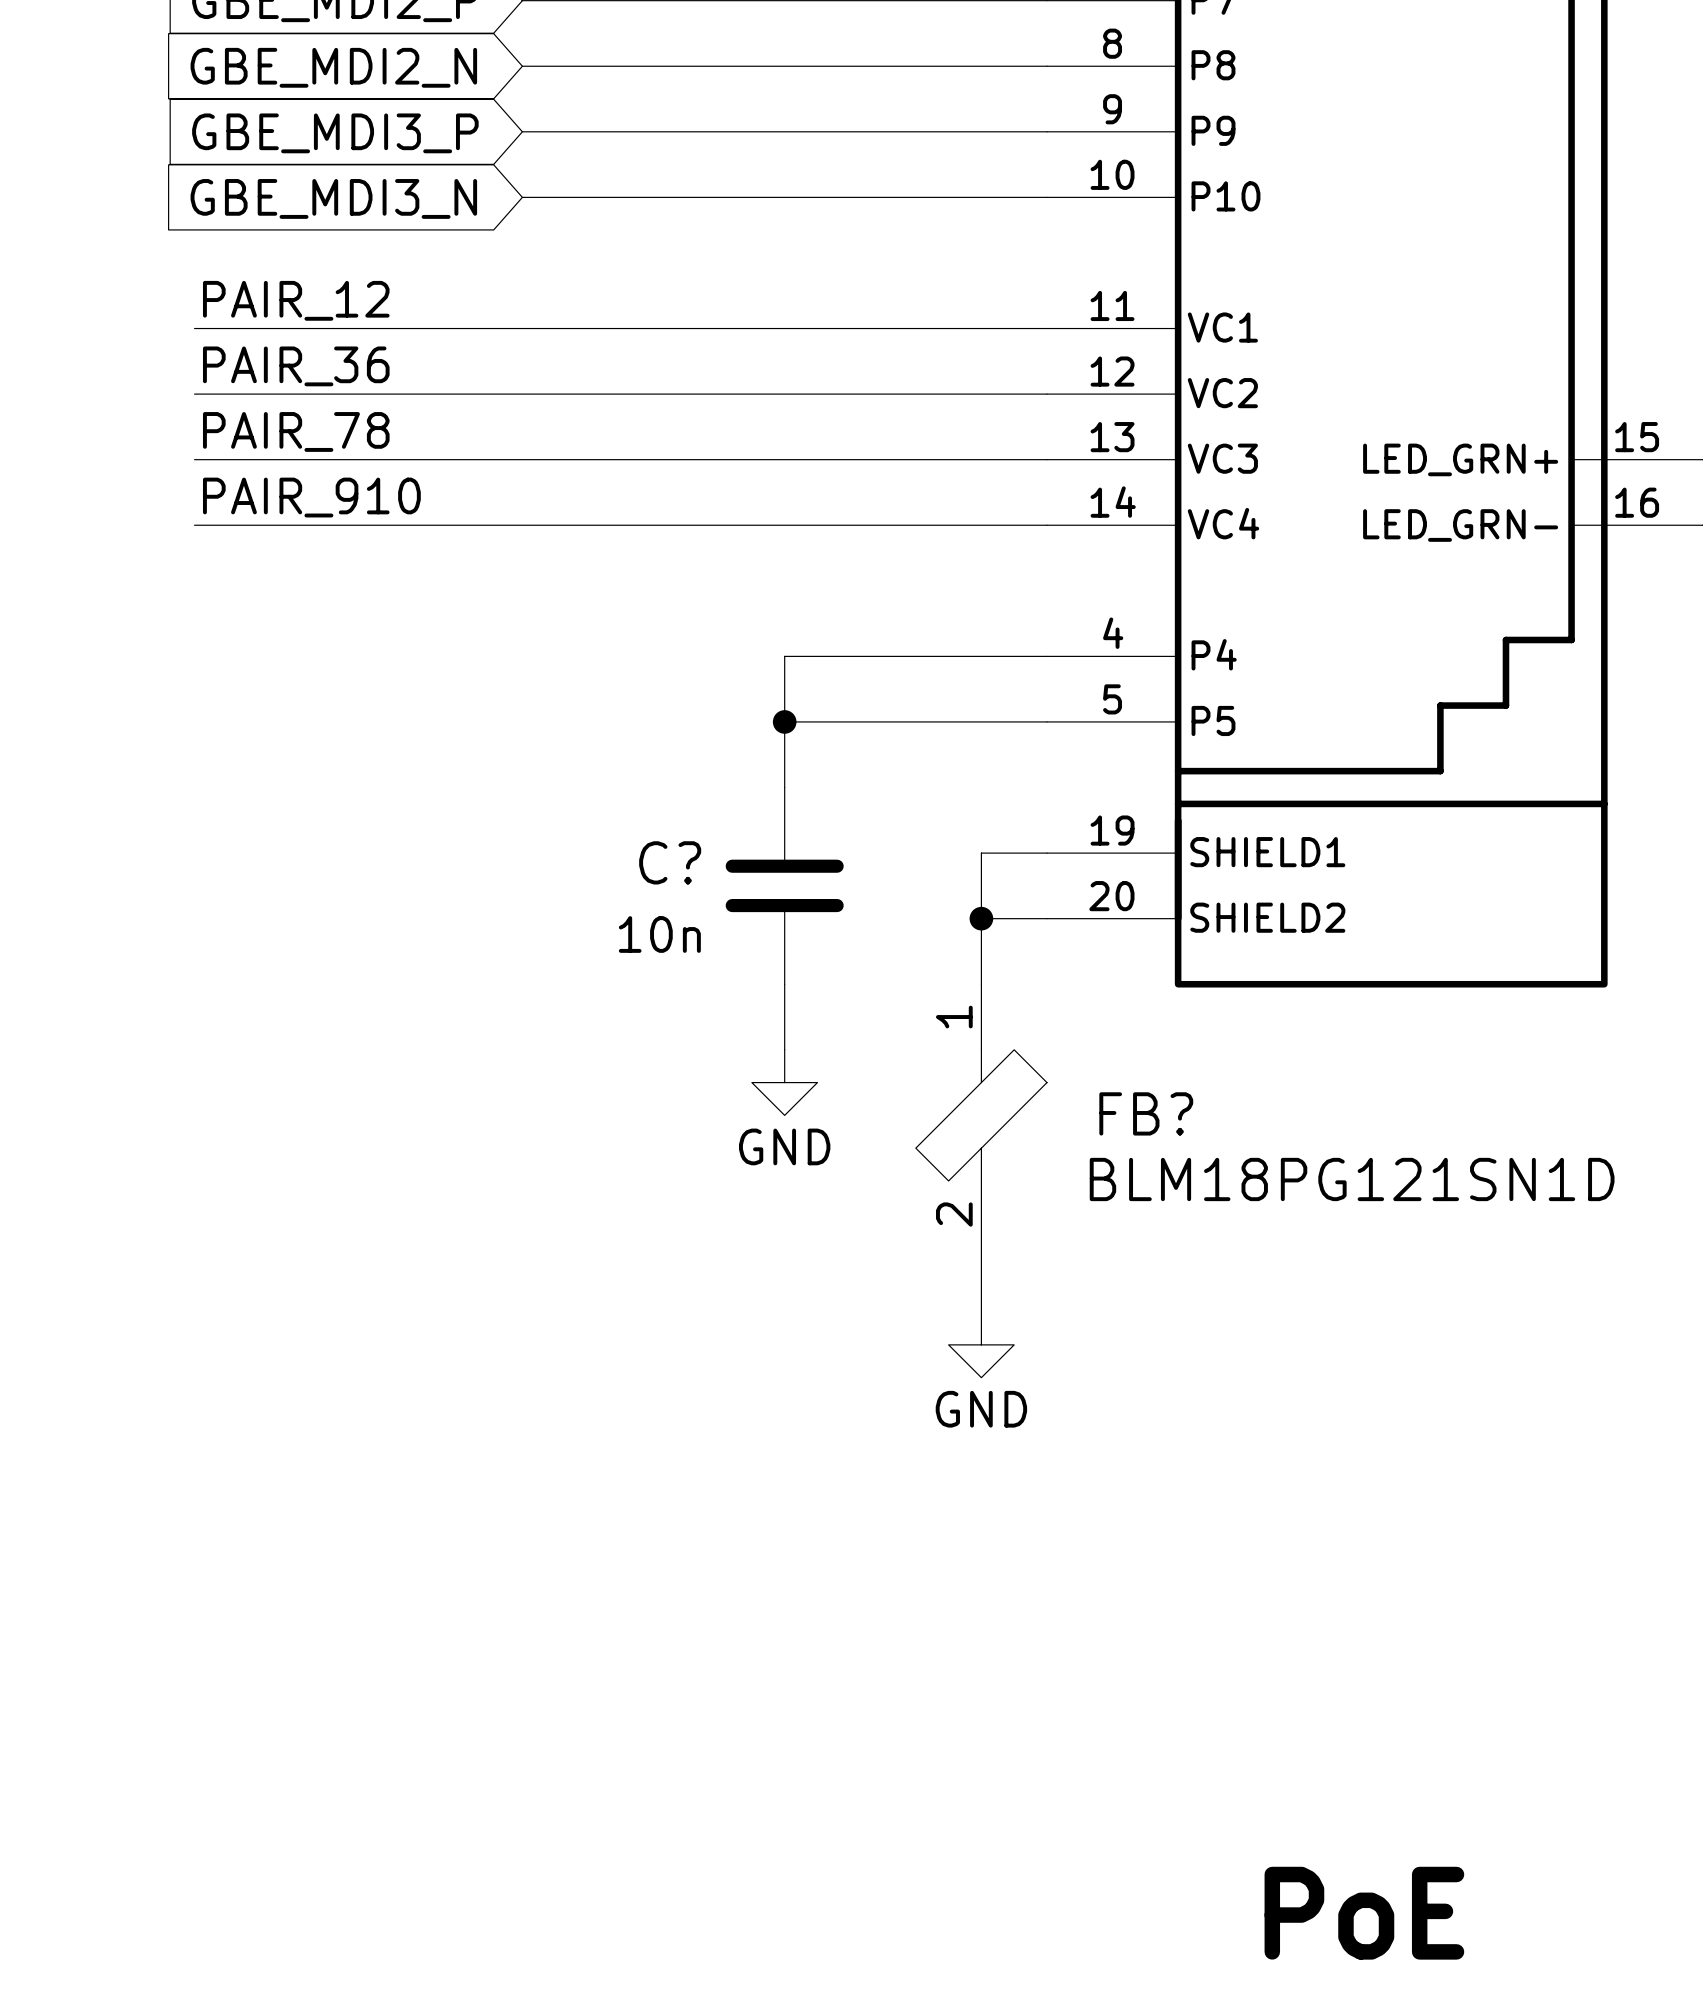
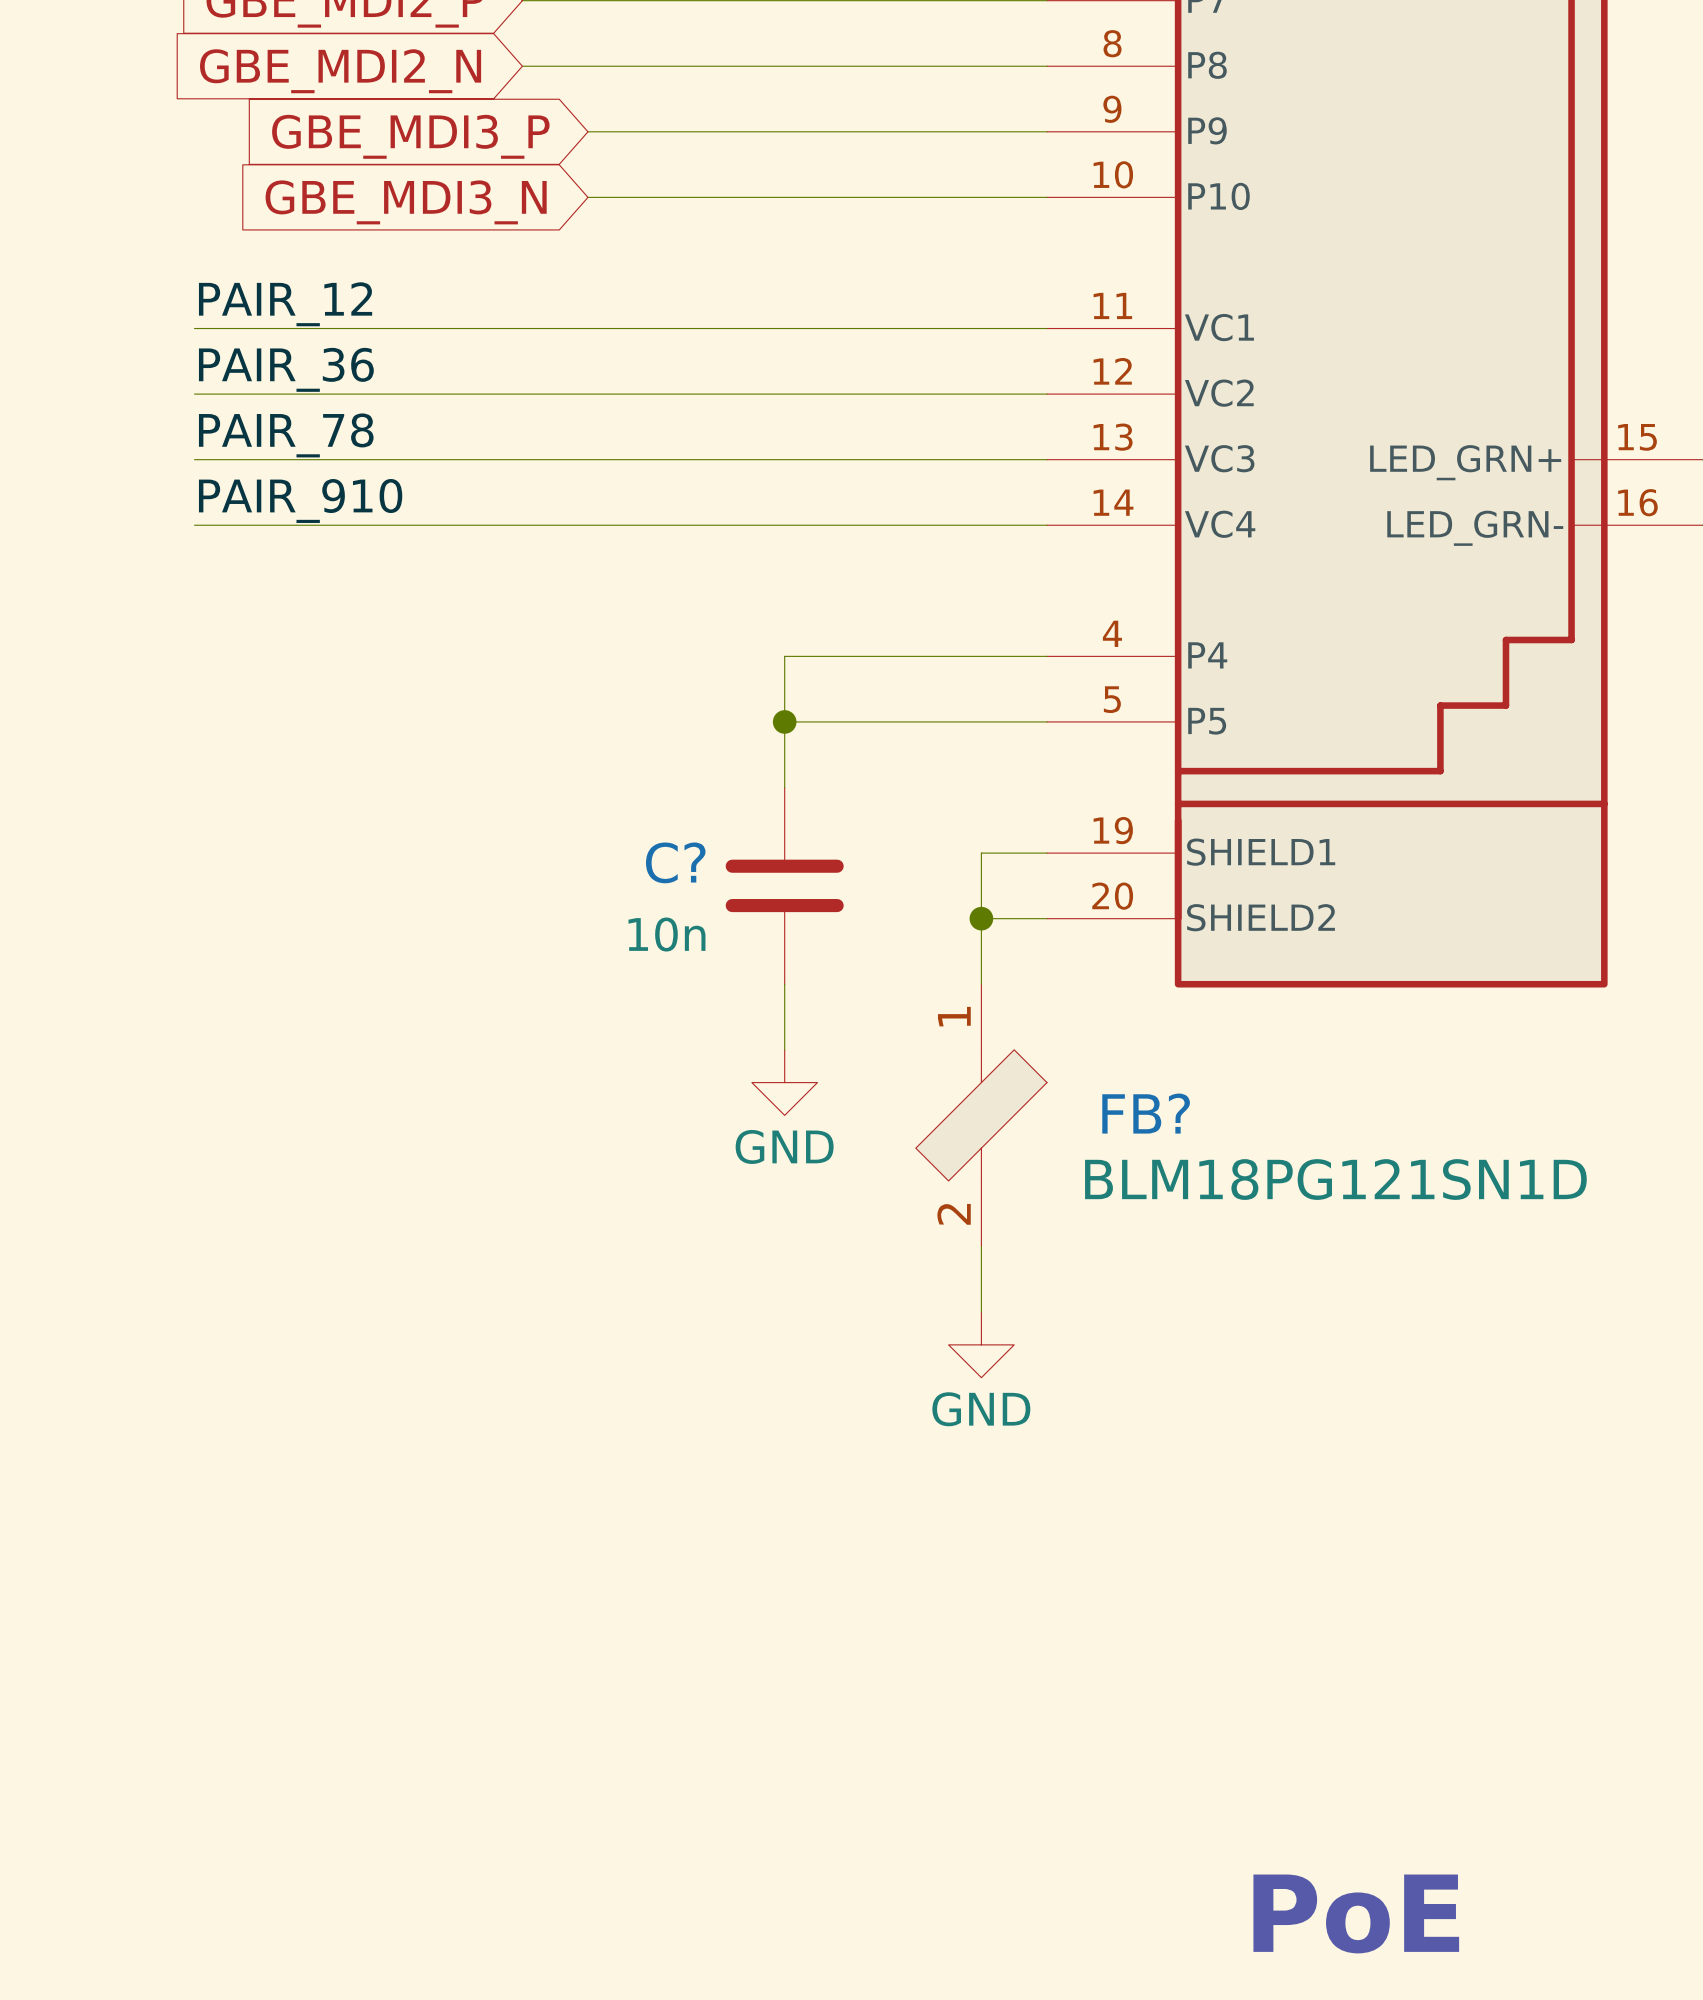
wire: (522, 131) (587, 131) -> none
global label position: GBE_MDI3_P (335, 133) -> GBE_MDI3_P (410, 136)
wire: (522, 197) (587, 197) -> none
global label position: GBE_MDI3_N (333, 198) -> GBE_MDI3_N (406, 202)

